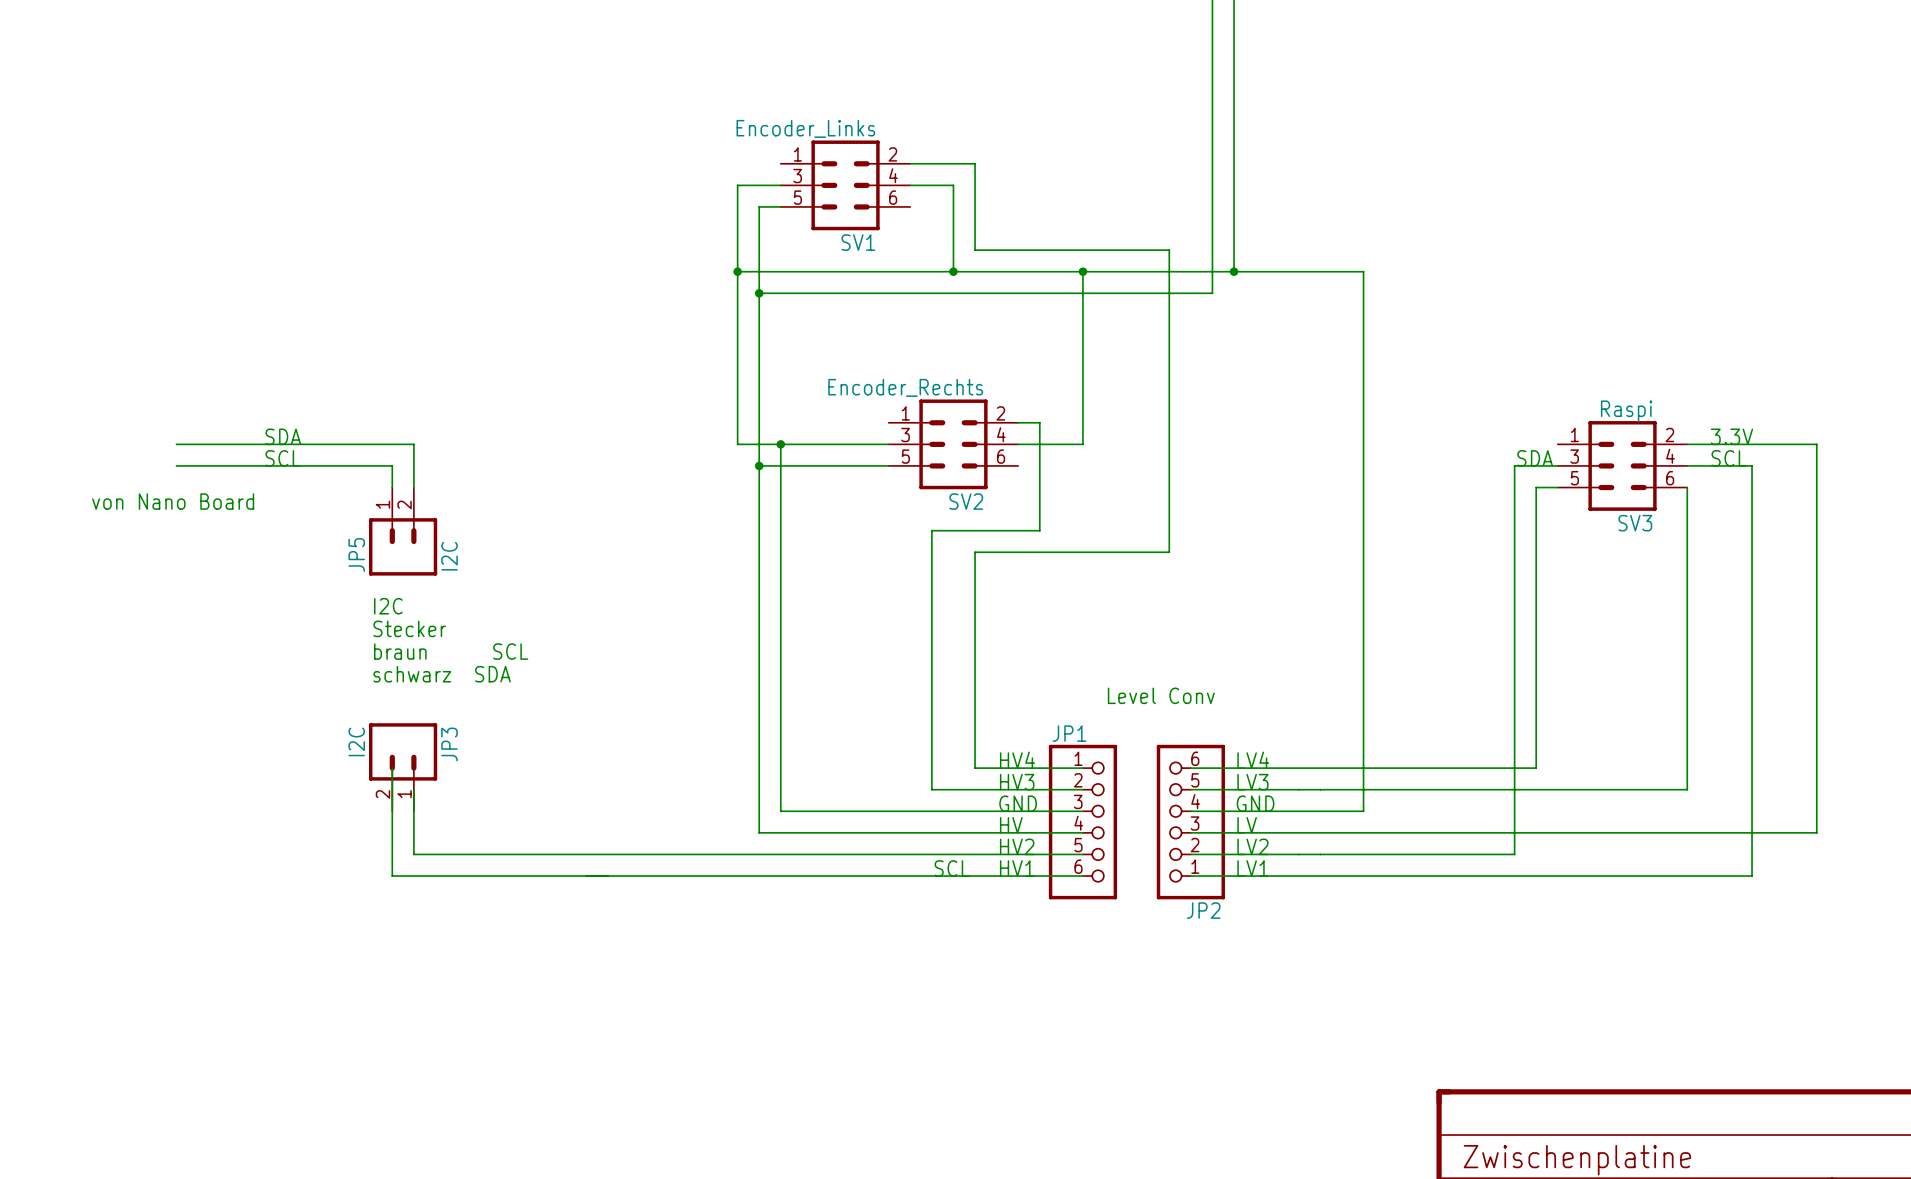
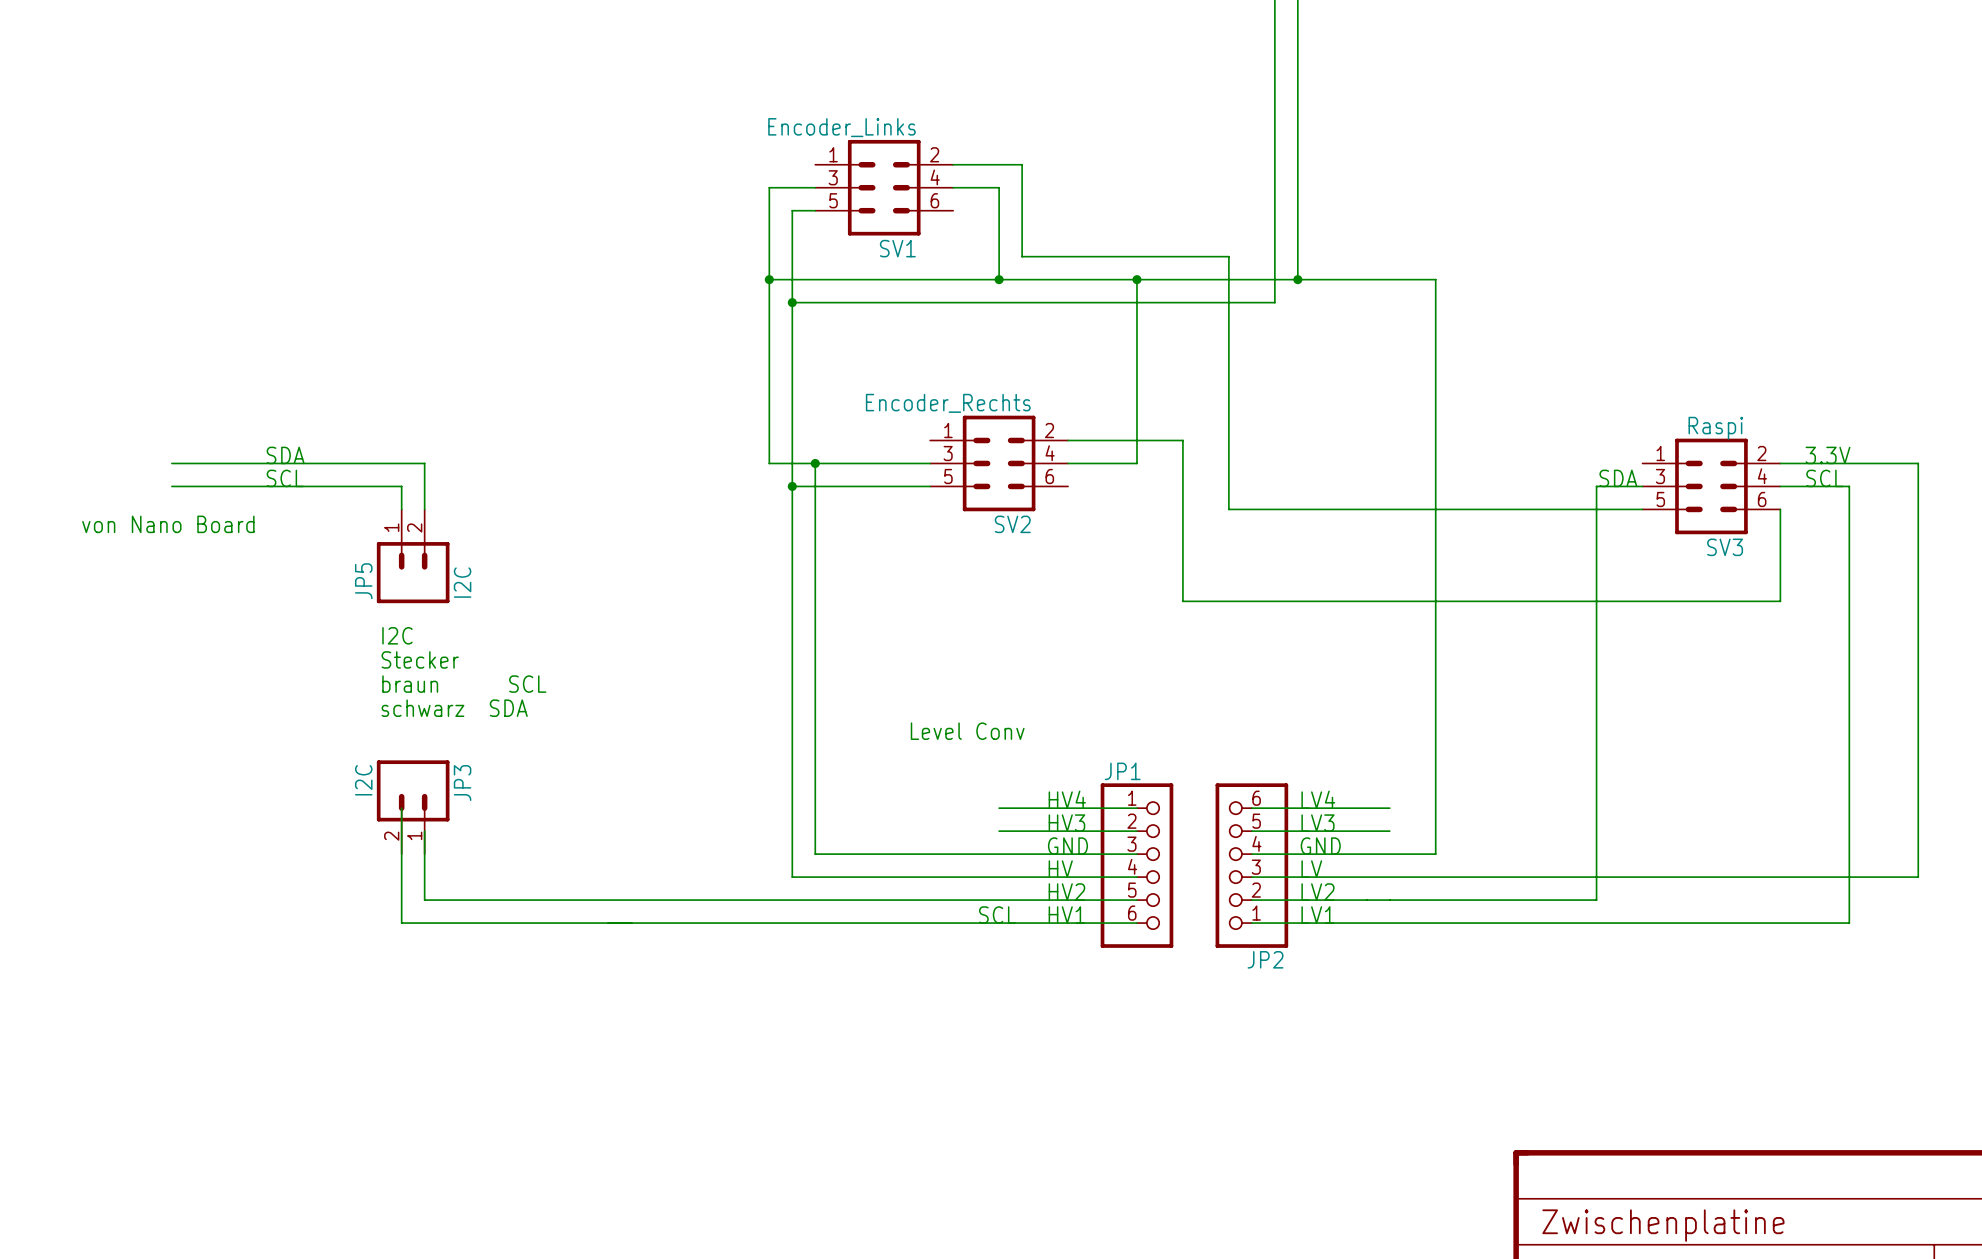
wire: (1039, 422) (1039, 530) (931, 530) (931, 789) (953, 789) -> none
wire: (1169, 487) (1169, 552) (975, 552) (975, 768) -> (999, 808) (1022, 808)
wire: (1536, 487) (1536, 768) (1320, 768) -> (1619, 509) (1228, 509)
wire: (1687, 573) (1687, 789) (1320, 789) -> (1780, 601) (1182, 601) (1182, 440) (1091, 440)
text: none -> Level Conv (967, 731)
text: Level Conv (1161, 695) -> none

